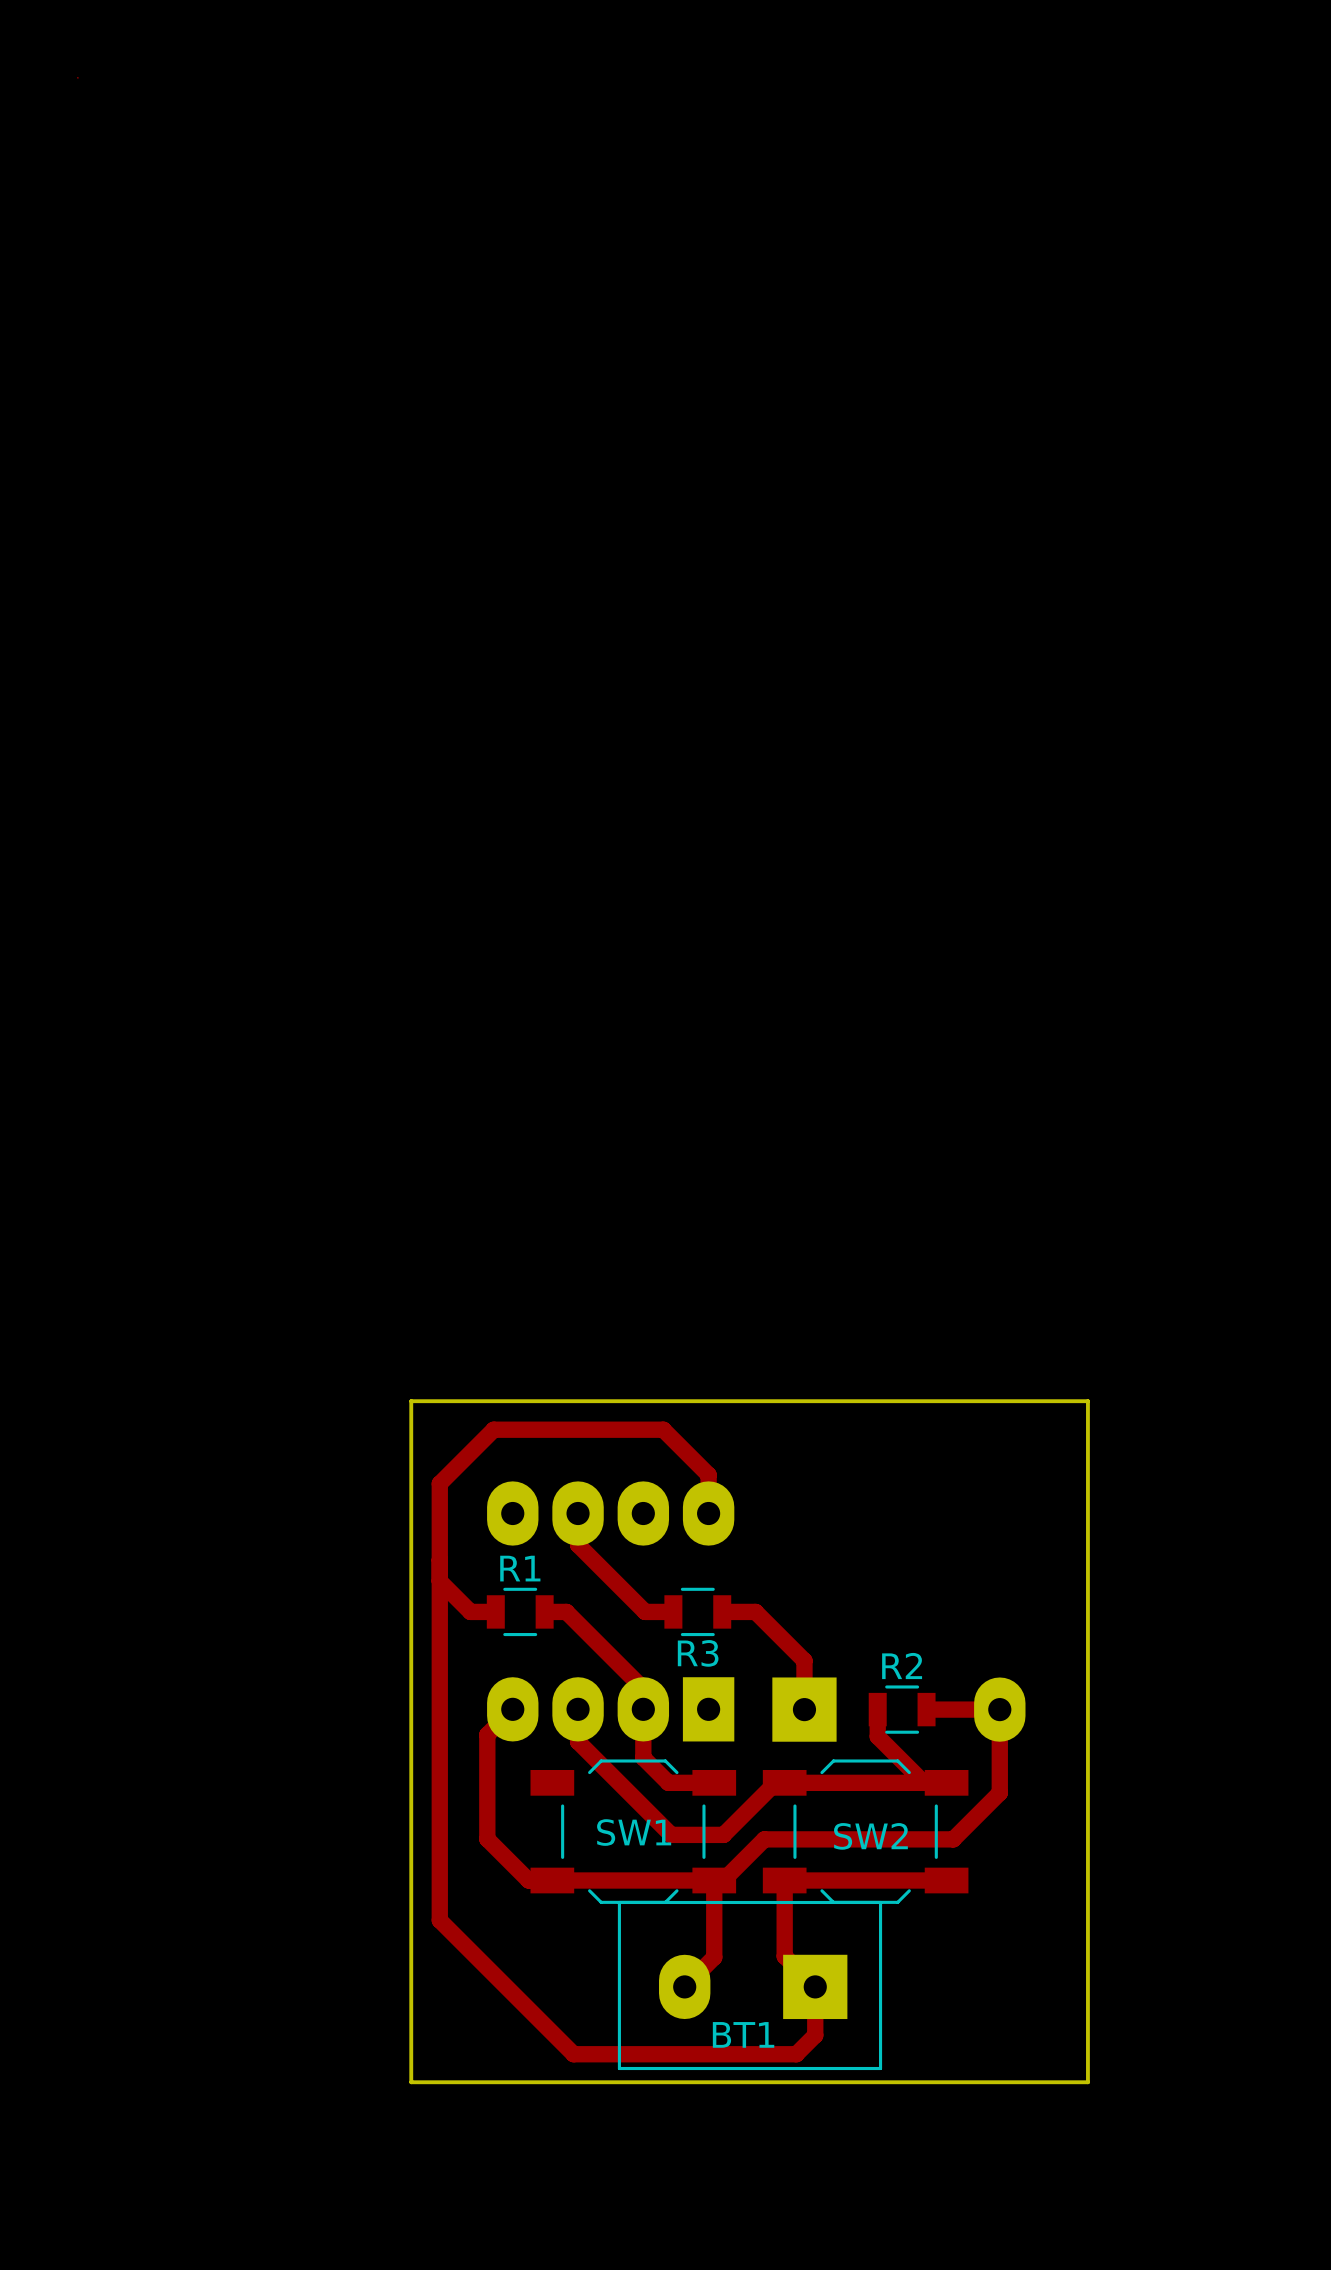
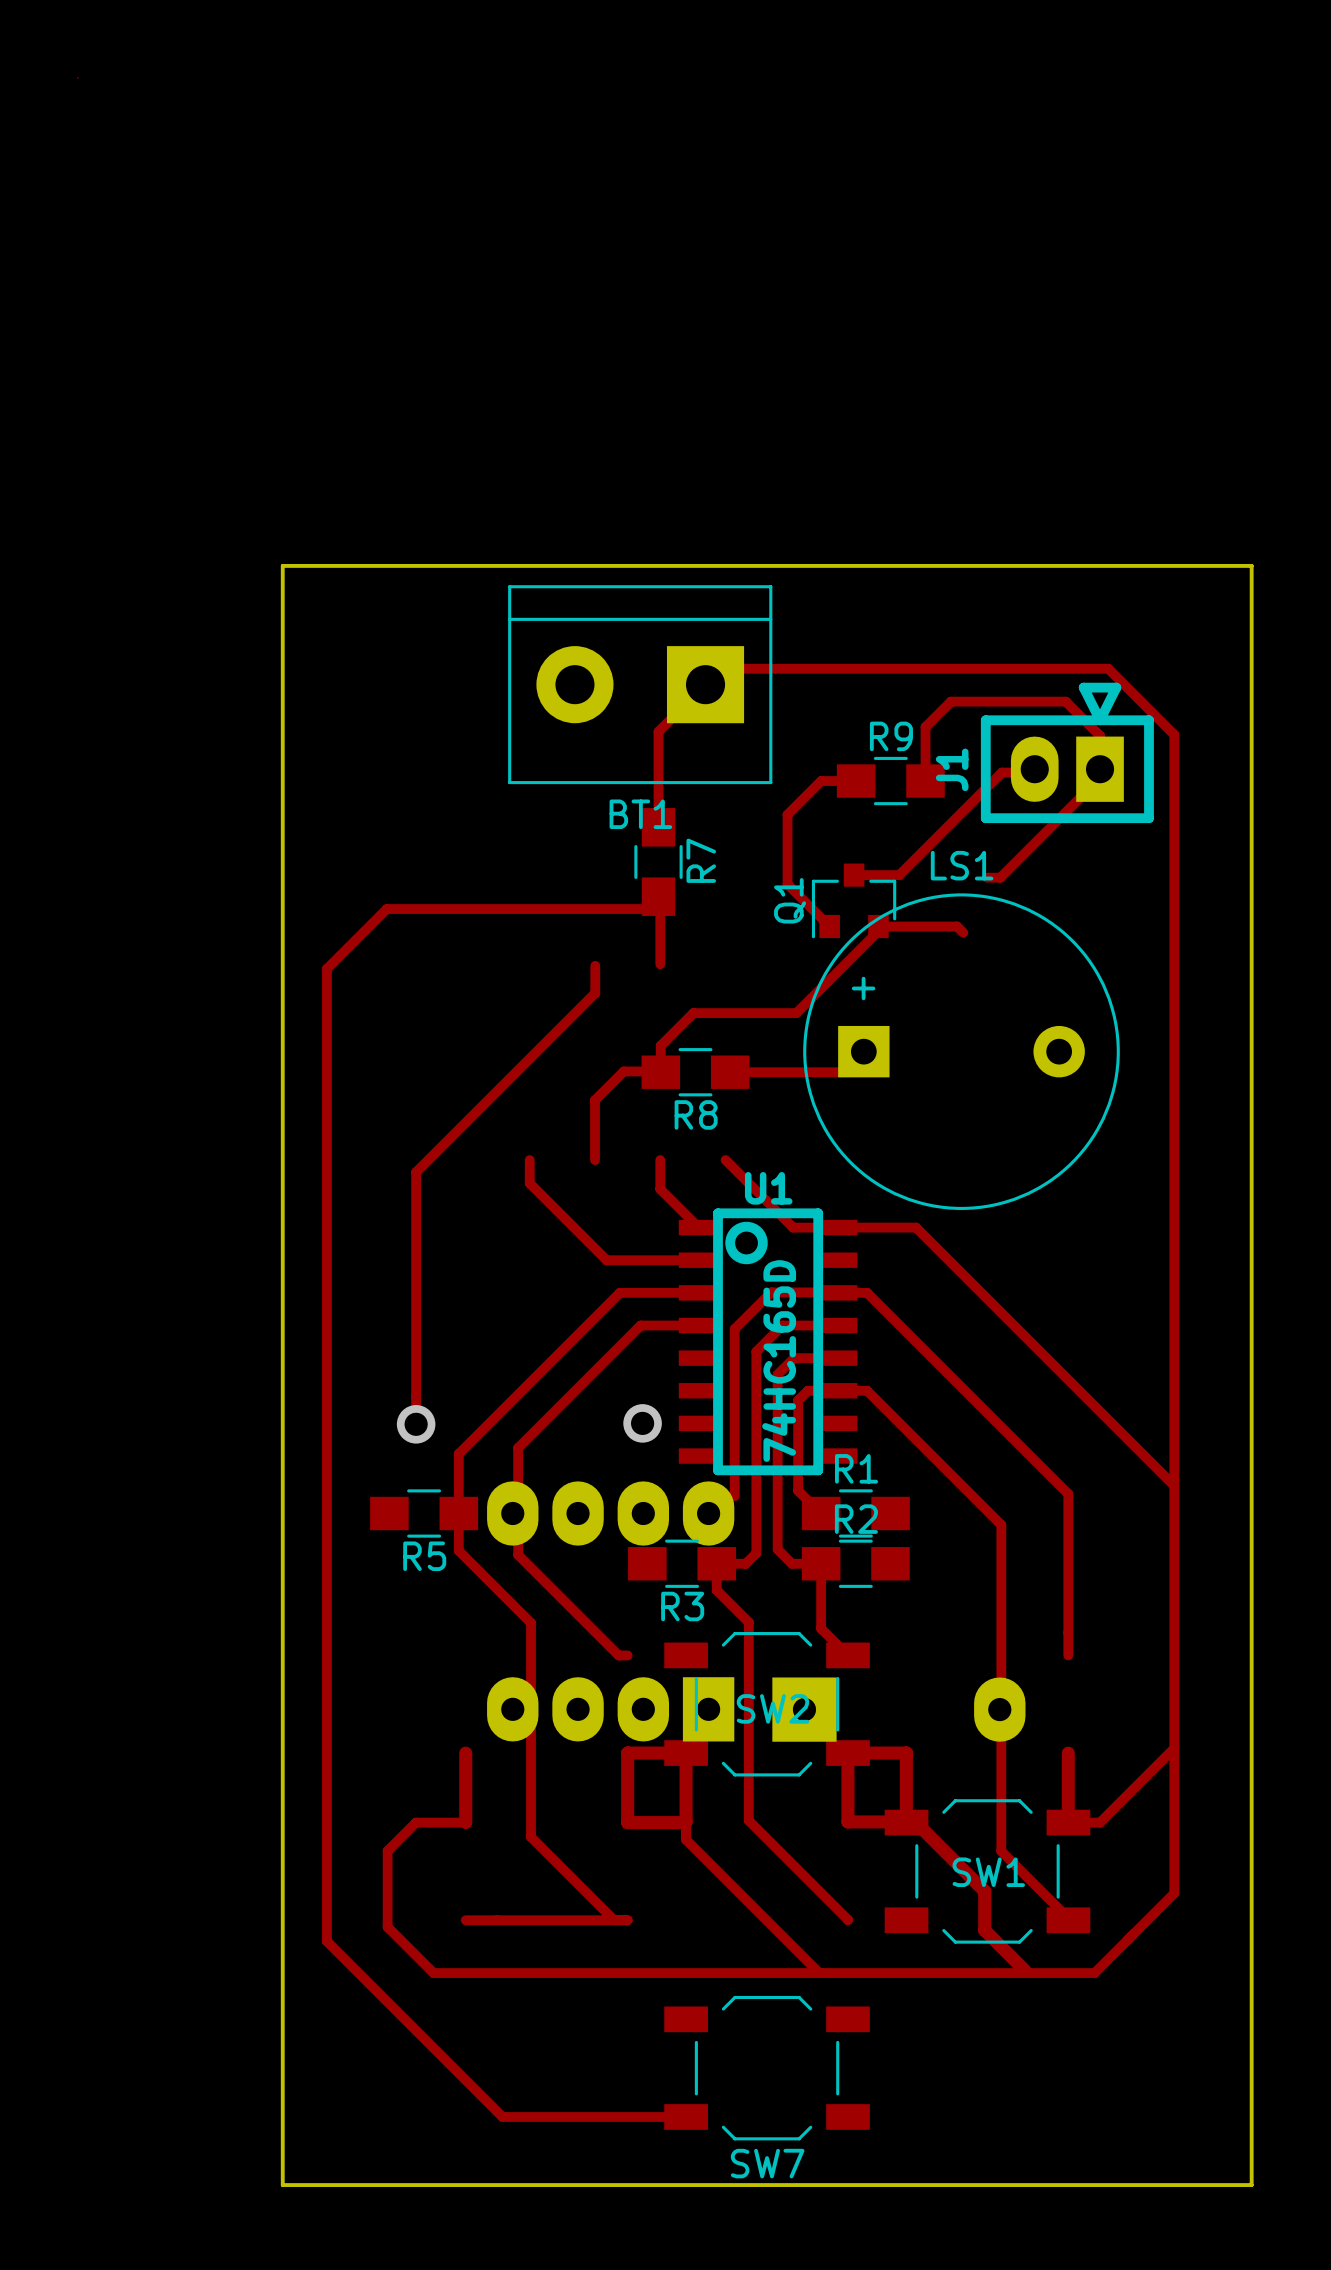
board edge: none -> (282, 565) (282, 2185) (1251, 2185) (1251, 565) (282, 565)
J1: none -> (1067, 752)
track: none -> (1037, 772) (1001, 772) (899, 875) (854, 875)
track: none -> (856, 781) (821, 781) (787, 814) (787, 884) (829, 926)
R9: none -> (890, 781)
track: none -> (925, 781) (925, 727) (950, 701) (1065, 701) (1100, 735) (1100, 778) (1000, 877) (987, 877)
track: none -> (658, 827) (658, 731) (720, 668) (1108, 668) (1174, 734) (1174, 1893) (1094, 1973) (433, 1973) (387, 1927) (387, 1850) (415, 1822) (465, 1822) (465, 1753)
R7: none -> (658, 861)
track: none -> (660, 898) (649, 909) (386, 909) (326, 968) (326, 1941) (502, 2116) (686, 2116)
track: none -> (660, 898) (660, 964)
Q1: none -> (854, 900)
track: none -> (963, 932) (957, 926) (878, 926) (878, 931) (796, 1013) (693, 1013) (660, 1045) (660, 1072) (671, 1072)
track: none -> (595, 965) (595, 993) (416, 1172) (416, 1424)
track: none -> (863, 1051) (843, 1072) (730, 1072)
LS1: none -> (961, 1051)
track: none -> (662, 1071) (623, 1071) (595, 1100) (595, 1160)
R8: none -> (695, 1072)
track: none -> (529, 1160) (529, 1183) (606, 1260) (698, 1260)
track: none -> (660, 1160) (660, 1189) (698, 1227)
track: none -> (725, 1160) (793, 1227) (916, 1227) (1174, 1485)
track: none -> (698, 1292) (619, 1292) (458, 1453) (458, 1550) (531, 1622) (531, 1837) (614, 1920)
track: none -> (837, 1292) (867, 1292) (1068, 1493) (1068, 1655)
track: none -> (838, 1292) (771, 1292) (734, 1329) (734, 1496)
track: none -> (698, 1325) (640, 1325) (518, 1447) (518, 1554) (618, 1655) (627, 1655)
track: none -> (837, 1325) (782, 1325) (756, 1351) (756, 1553) (745, 1563) (716, 1563) (716, 1590) (748, 1622) (748, 1820) (847, 1919)
U1: none -> 74HC165D (768, 1341)
track: none -> (837, 1358) (794, 1358) (777, 1374) (777, 1549) (792, 1563) (821, 1563) (821, 1628) (848, 1655) (852, 1655)
board edge: (411, 1401) (411, 2082) (1087, 2082) (1087, 1401) (411, 1401) -> none
via: none -> (642, 1423)
via: none -> (416, 1424)
track: (578, 1507) (578, 1544) (645, 1611) (673, 1611) -> none
R5: none -> (424, 1513)
track: (708, 1513) (708, 1474) (663, 1429) (493, 1429) (439, 1483) (439, 1920) (573, 2054) (796, 2054) (815, 2035) (815, 1986) (784, 1956) (784, 1880) (946, 1879) -> none
track: none -> (820, 1513) (798, 1490) (798, 1400) (807, 1390) (867, 1390) (1001, 1524) (1001, 1851) (1068, 1920)
track: (439, 1581) (470, 1611) (495, 1611) -> none
R1 footprint: [486, 1587, 554, 1637] -> [801, 1489, 910, 1538]
R3 footprint: [664, 1587, 732, 1637] -> [628, 1539, 737, 1588]
track: (544, 1611) (566, 1611) (643, 1688) (643, 1757) (668, 1782) (714, 1782) -> none
track: (722, 1611) (755, 1611) (804, 1660) (804, 1707) -> none
R2 footprint: [868, 1685, 936, 1734] -> [801, 1539, 910, 1588]
track: (512, 1709) (487, 1734) (487, 1839) (528, 1880) (723, 1880) (764, 1839) (953, 1839) (999, 1792) (999, 1709) (927, 1709) -> none
track: (578, 1709) (578, 1741) (671, 1834) (723, 1834) (775, 1782) (946, 1782) -> none
track: (877, 1709) (877, 1736) (923, 1782) -> none
track: none -> (1174, 1748) (1100, 1822) (1068, 1822)
track: none -> (906, 1753) (848, 1753) (847, 1821) (915, 1821) (984, 1891) (984, 1930) (1024, 1970)
track: none -> (906, 1753) (906, 1821)
track: none -> (1068, 1753) (1068, 1821)
track: none -> (686, 1821) (686, 1839) (819, 1973)
track: none -> (686, 1821) (627, 1822) (627, 1753) (686, 1753) (686, 1821)
SW1 position: (633, 1831) -> (987, 1871)
SW2 position: (865, 1831) -> (767, 1704)
track: (714, 1880) (714, 1957) (684, 1986) -> none
BT1 footprint: [617, 1900, 883, 2071] -> [508, 585, 773, 785]
track: none -> (465, 1920) (627, 1920)
BT1 name position: BT1 (743, 2034) -> BT1 (640, 814)
SW7: none -> (767, 2068)

